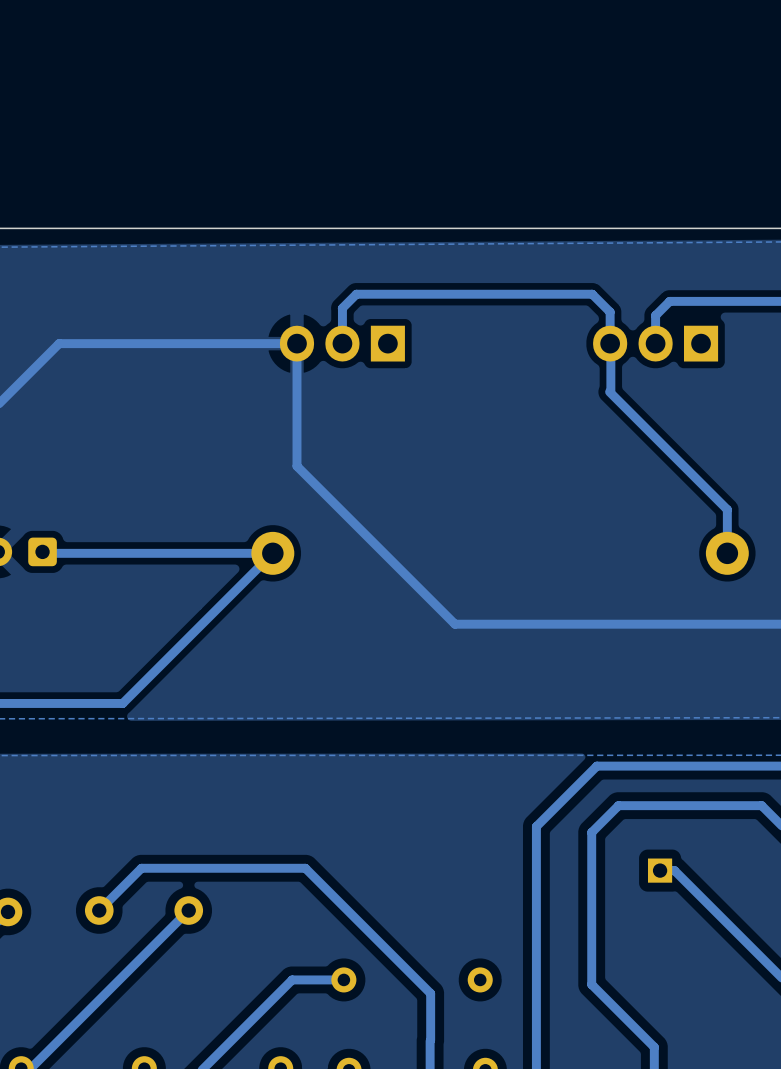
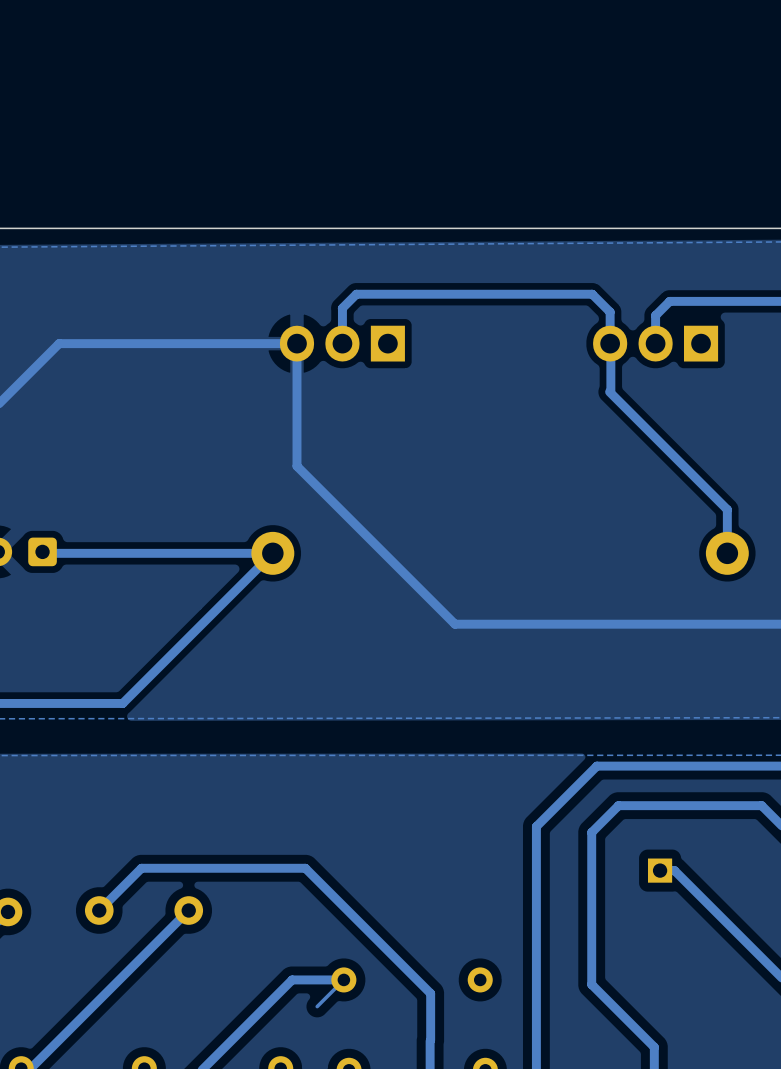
track: none -> (343, 979) (317, 1006)

